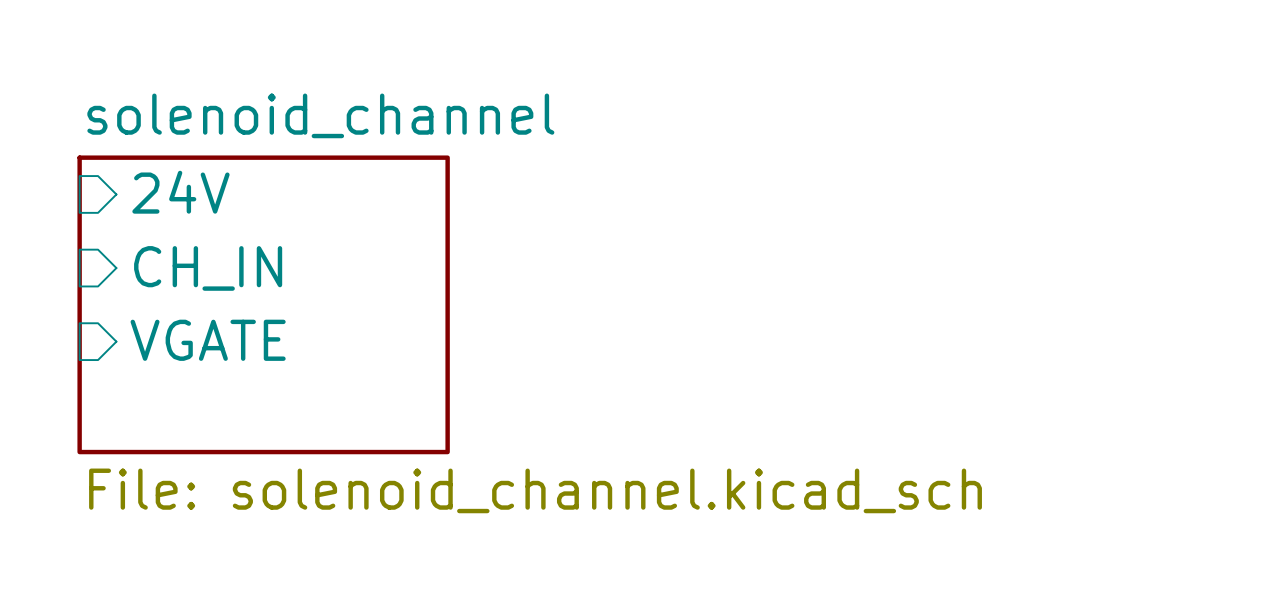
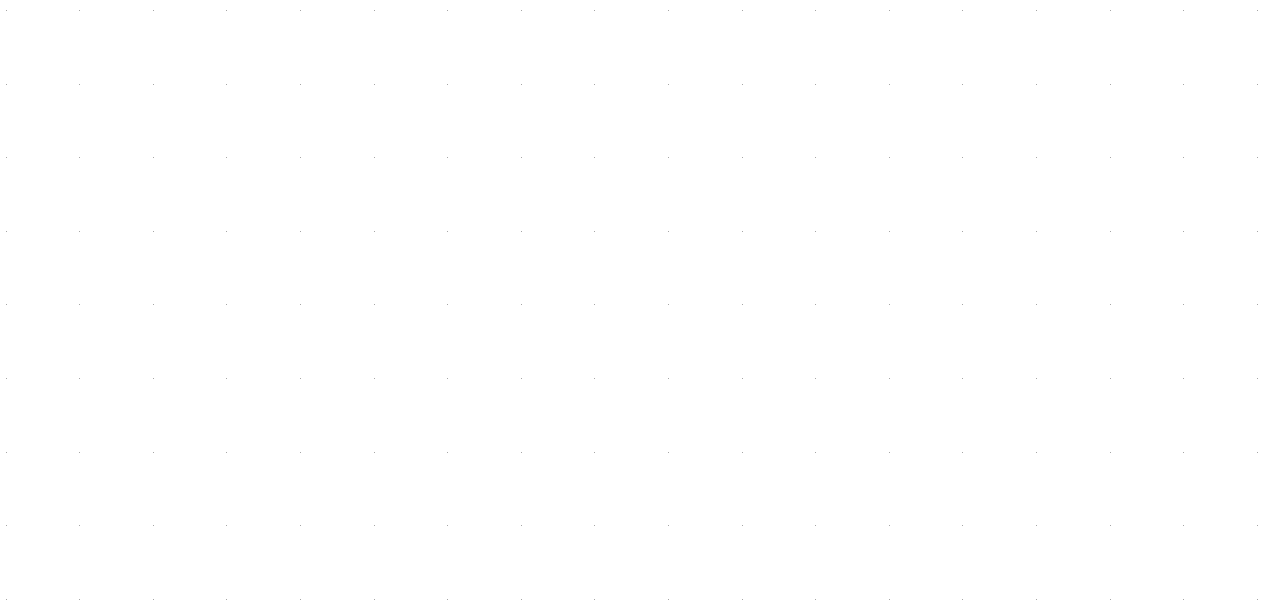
sheet pin: 24V (180, 192) -> none
sheet pin: CH_IN (208, 268) -> none
sheet solenoid_channel: File: solenoid_channel.kicad_sch (263, 304) -> none
sheet pin: VGATE (208, 340) -> none

